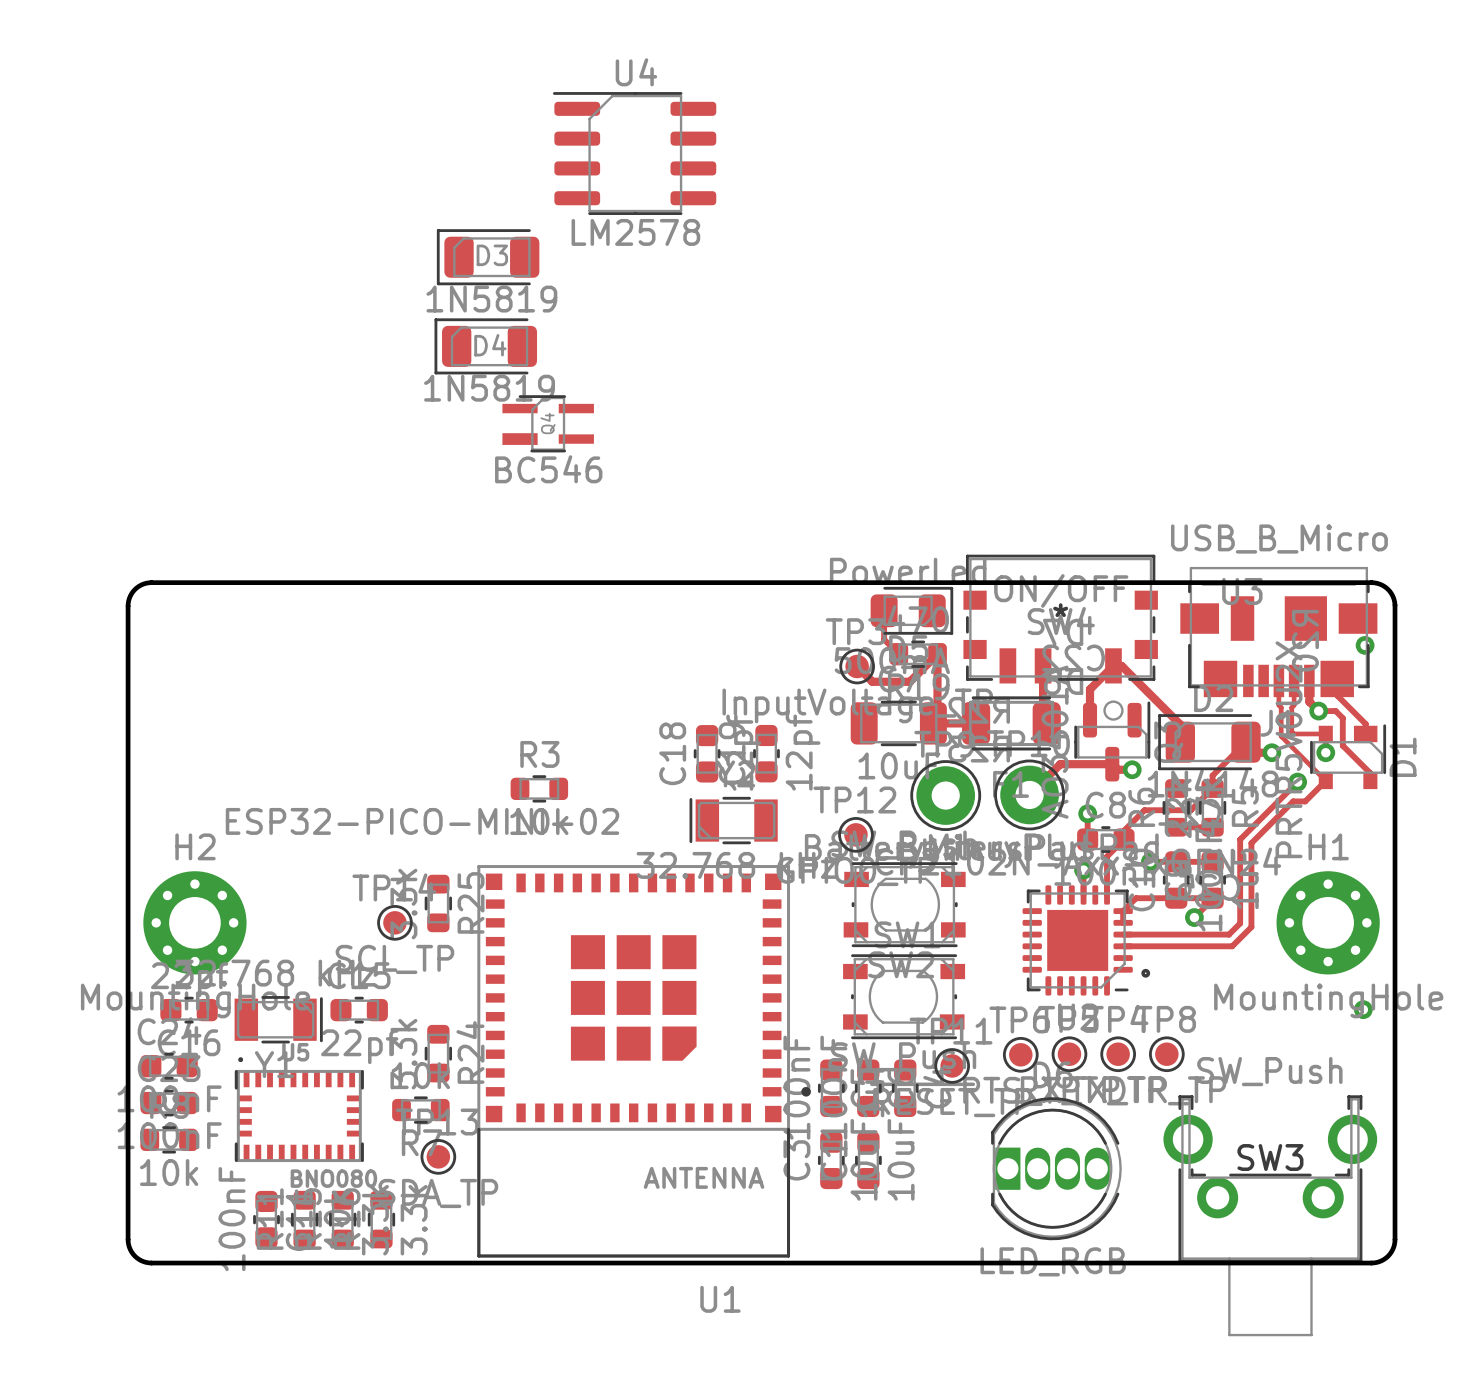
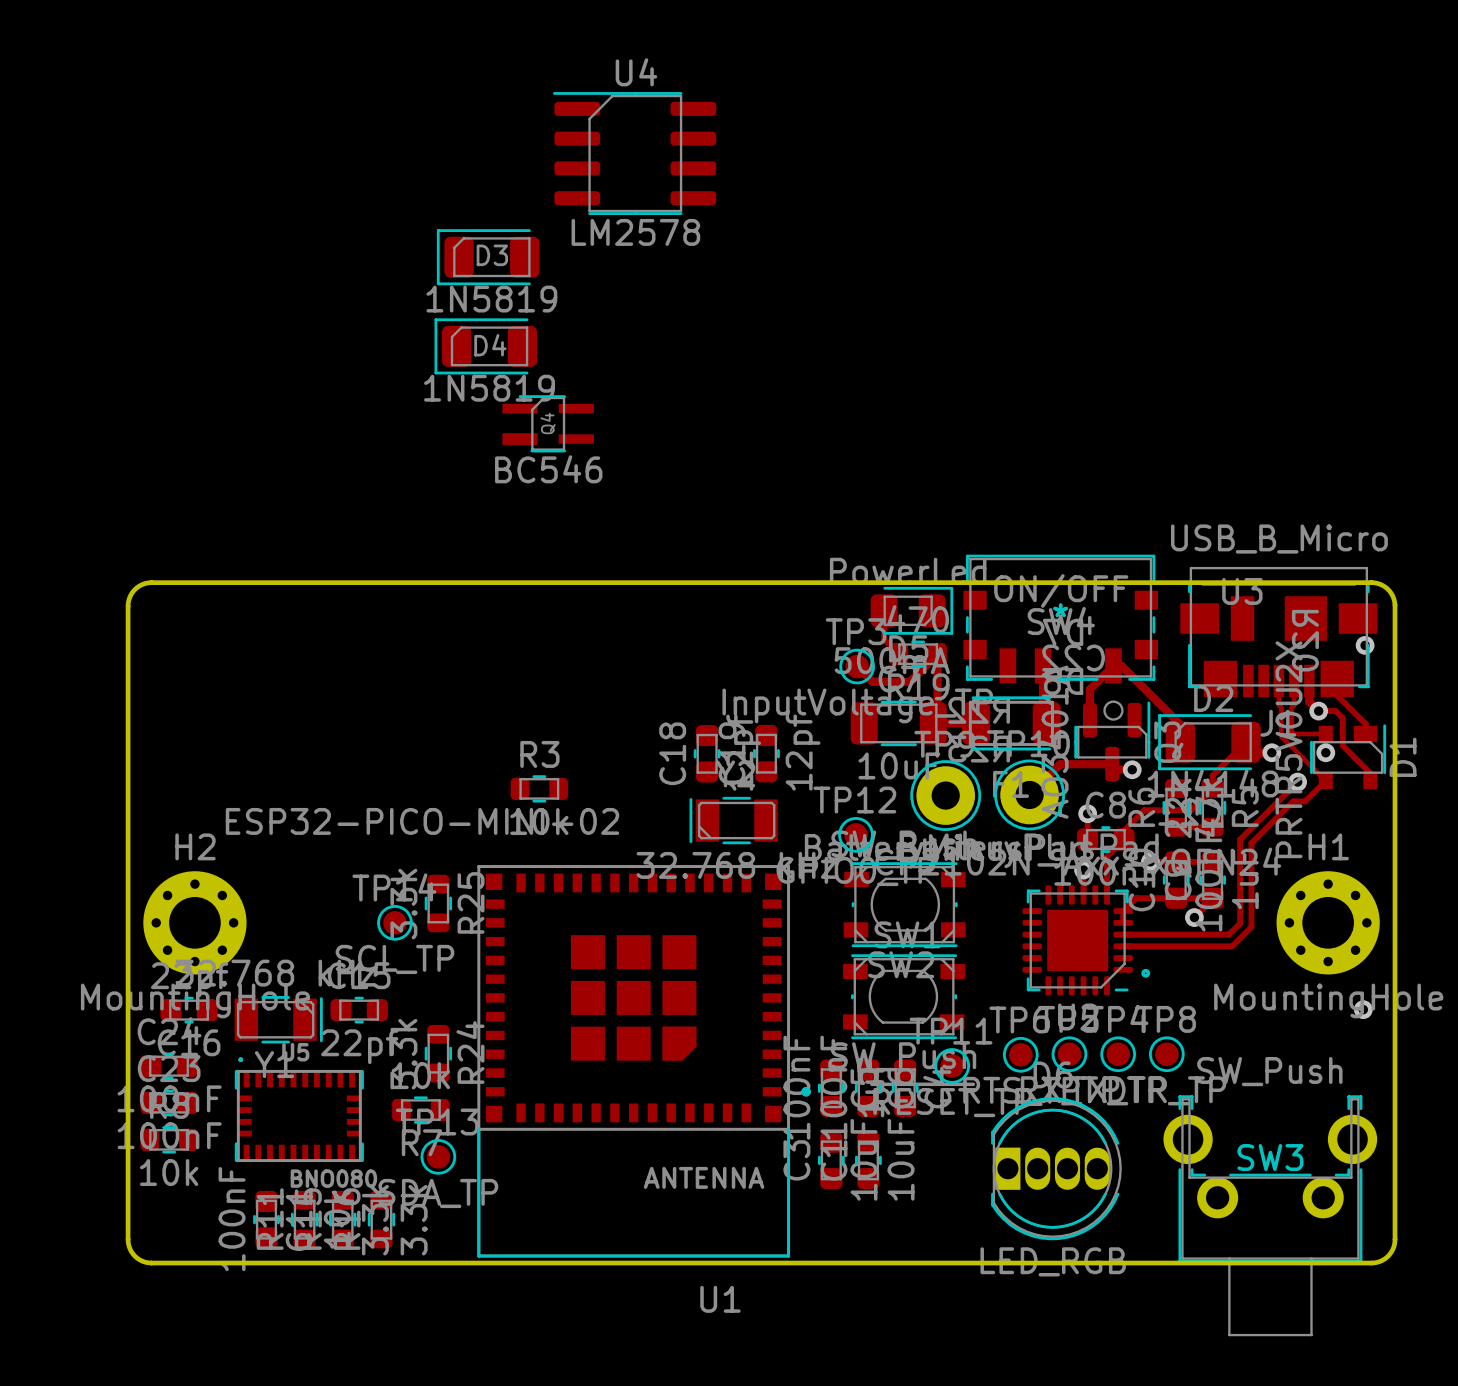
part: (1209, 887) -> none

